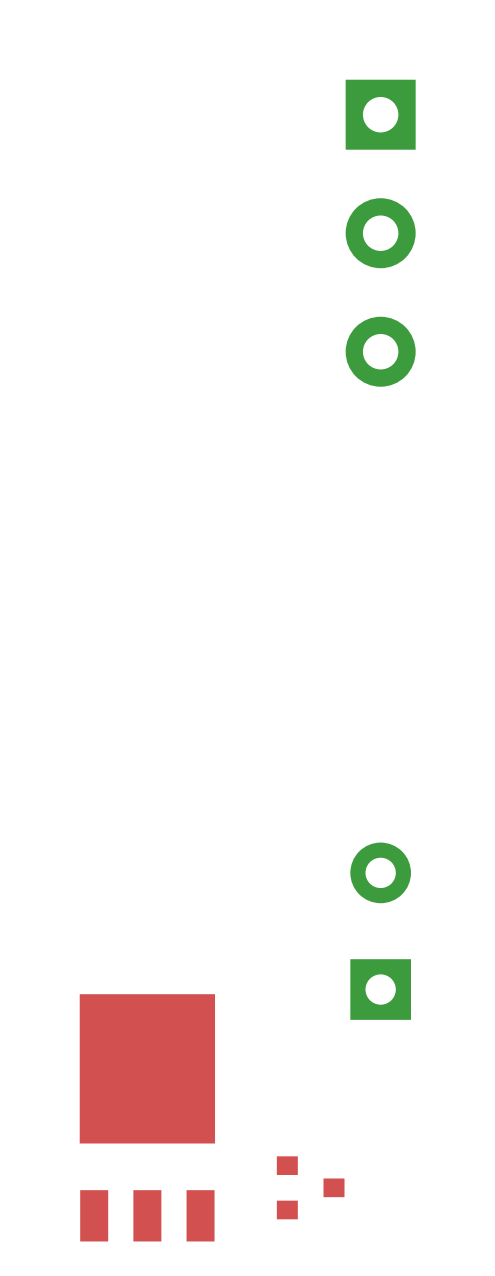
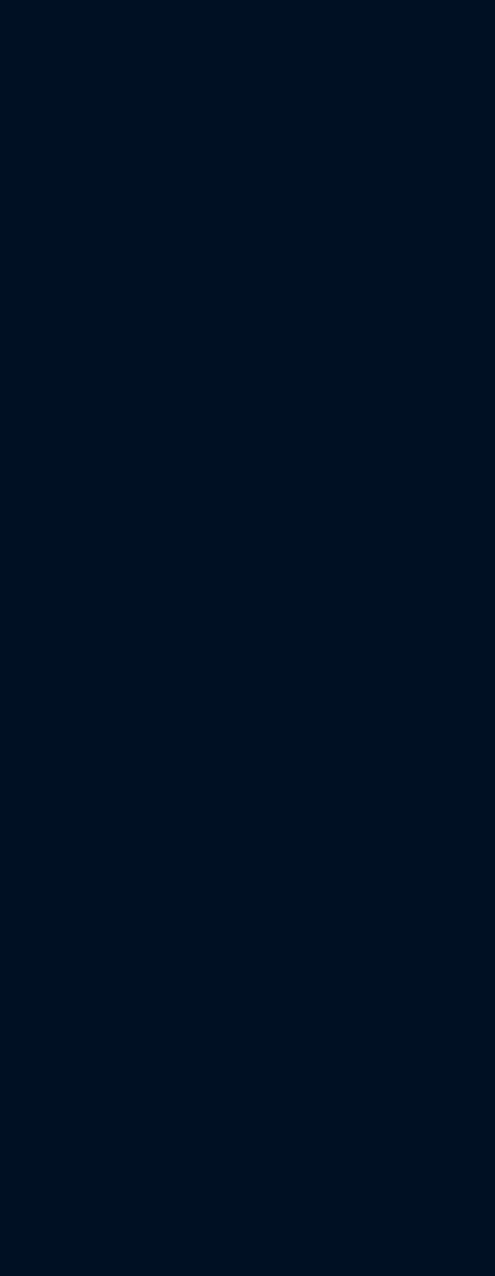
part: (380, 233) -> none
part: (380, 931) -> none
part: (147, 1117) -> none
part: (310, 1187) -> none

